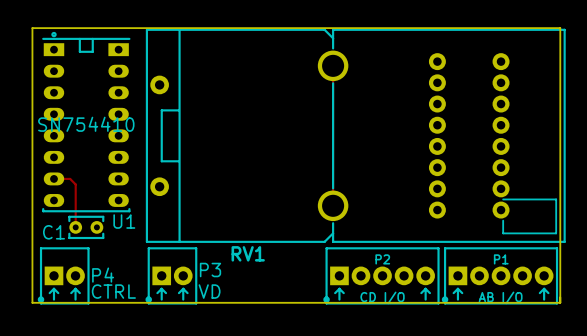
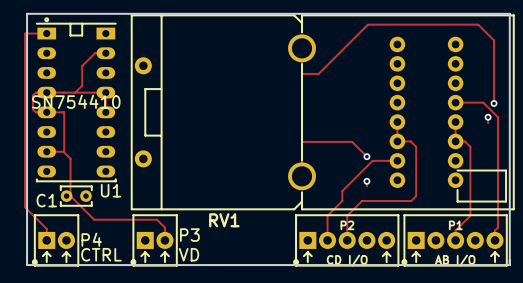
track: none -> (51, 33) (25, 33) (25, 207) (46, 228) (46, 240)
track: none -> (105, 53) (95, 53) (82, 66) (82, 85) (75, 92)
track: none -> (302, 73) (318, 73) (367, 24) (478, 24) (494, 40) (494, 103)
track: none -> (46, 92) (35, 92) (32, 95) (32, 109) (35, 112) (46, 112)
track: none -> (51, 92) (105, 92) (105, 112)
track: none -> (455, 102) (483, 102) (497, 117) (497, 227) (495, 230) (495, 240)
via: none -> (494, 103)
track: none -> (488, 117) (488, 123)
via: none -> (488, 117)
track: none -> (397, 122) (397, 141) (410, 141) (416, 146) (416, 196) (411, 201) (362, 201) (347, 215) (347, 240)
track: none -> (455, 122) (455, 141) (464, 141) (470, 146) (470, 215) (455, 230) (455, 240)
track: none -> (302, 141) (352, 141) (366, 156)
track: (70, 178) (75, 184) (75, 227) -> (61, 151) (64, 151) (64, 112) (51, 112)
track: none -> (64, 152) (70, 158) (70, 196) (94, 219) (157, 219) (164, 227) (164, 240)
via: none -> (366, 156)
track: none -> (397, 160) (372, 160) (342, 191) (342, 201) (327, 215) (327, 240)
track: none -> (366, 181) (366, 186)
via: none -> (366, 181)

